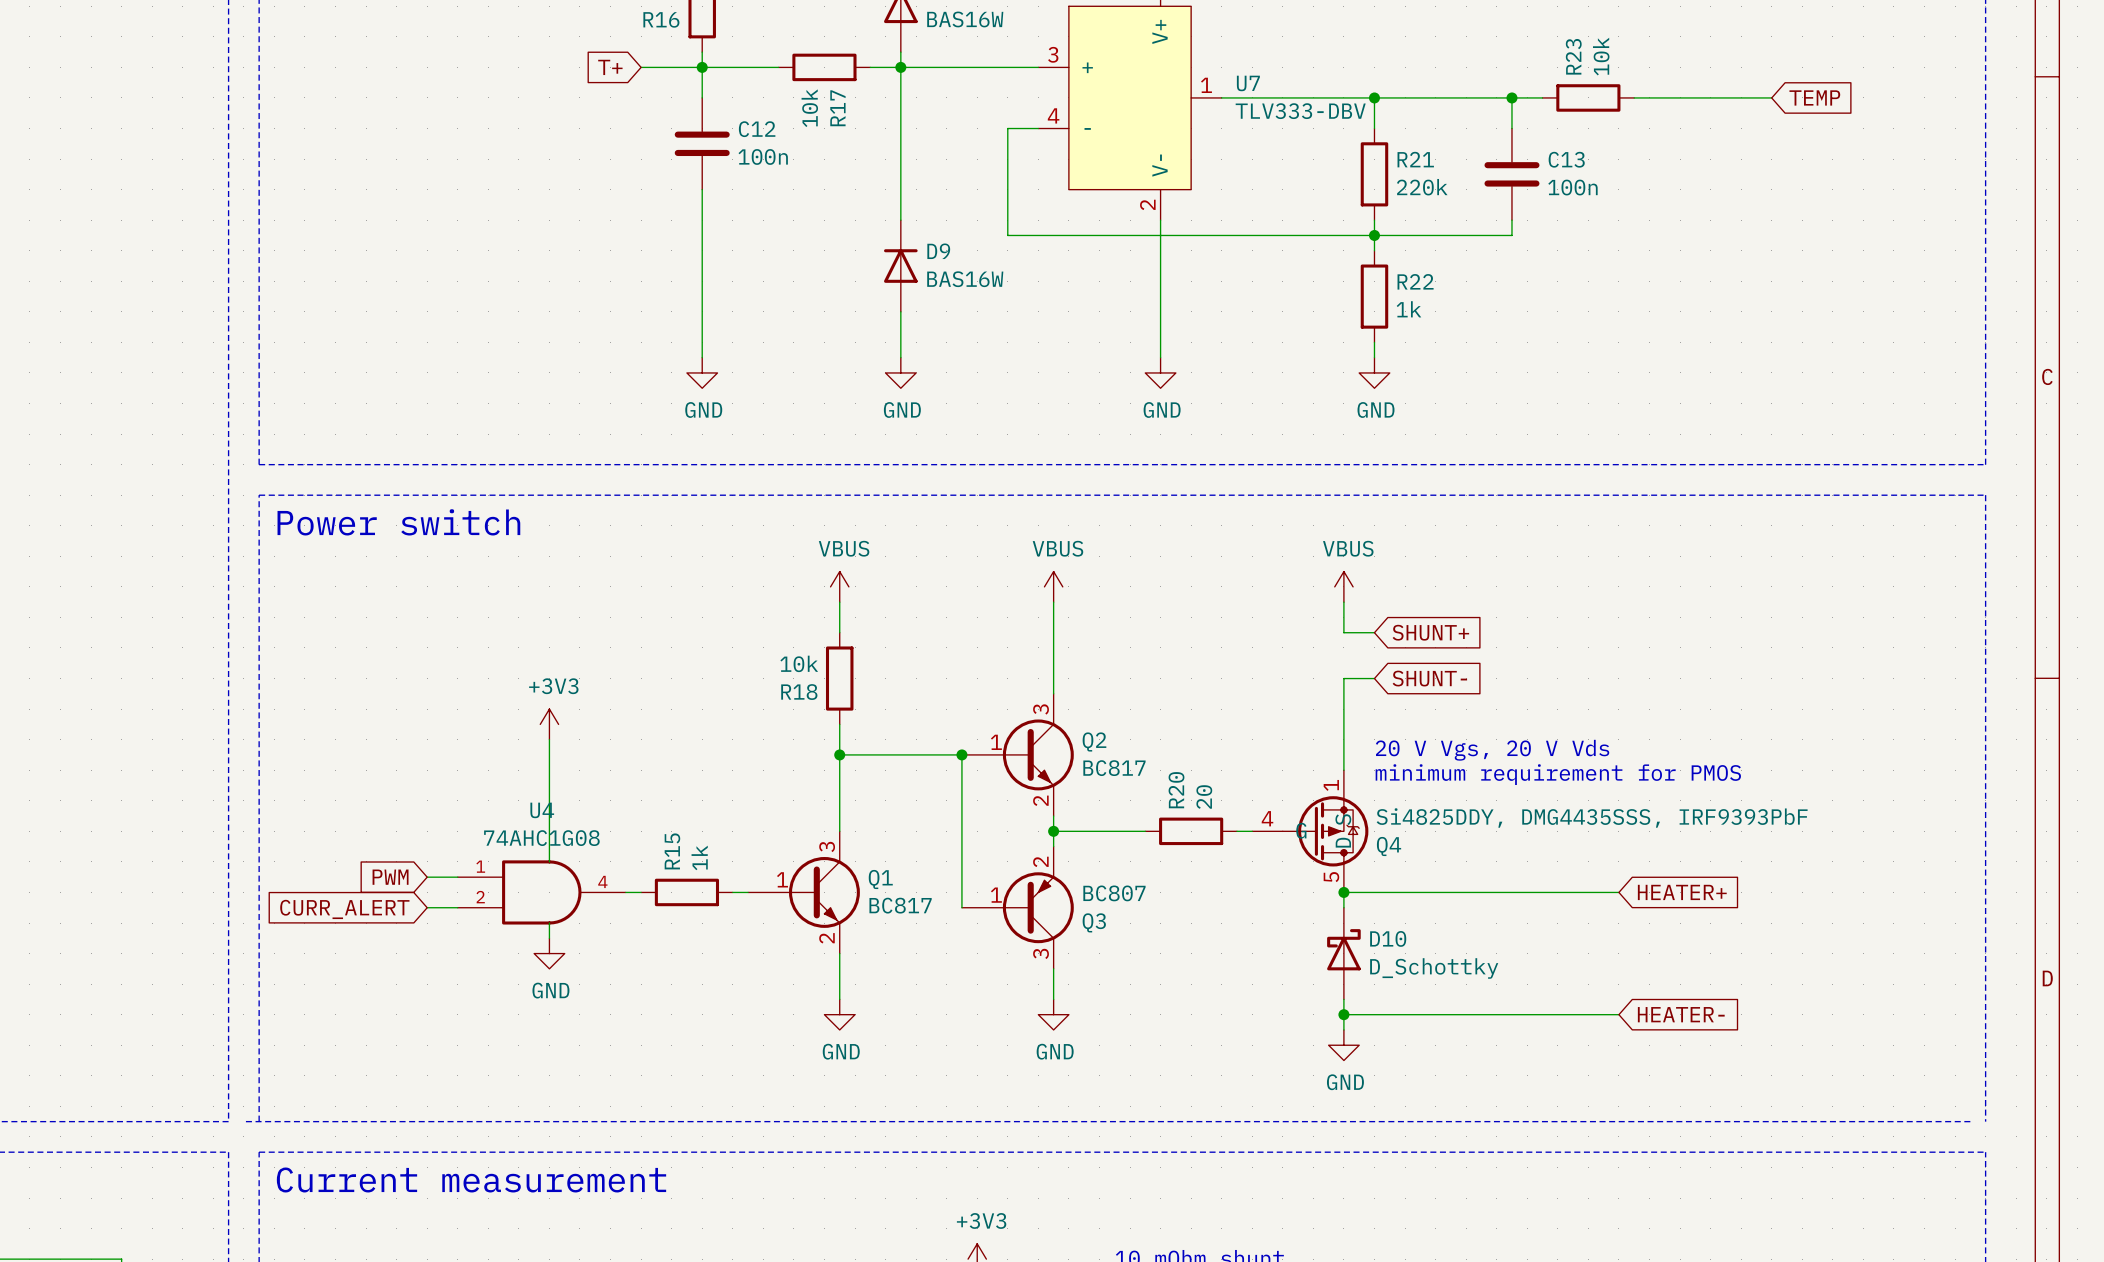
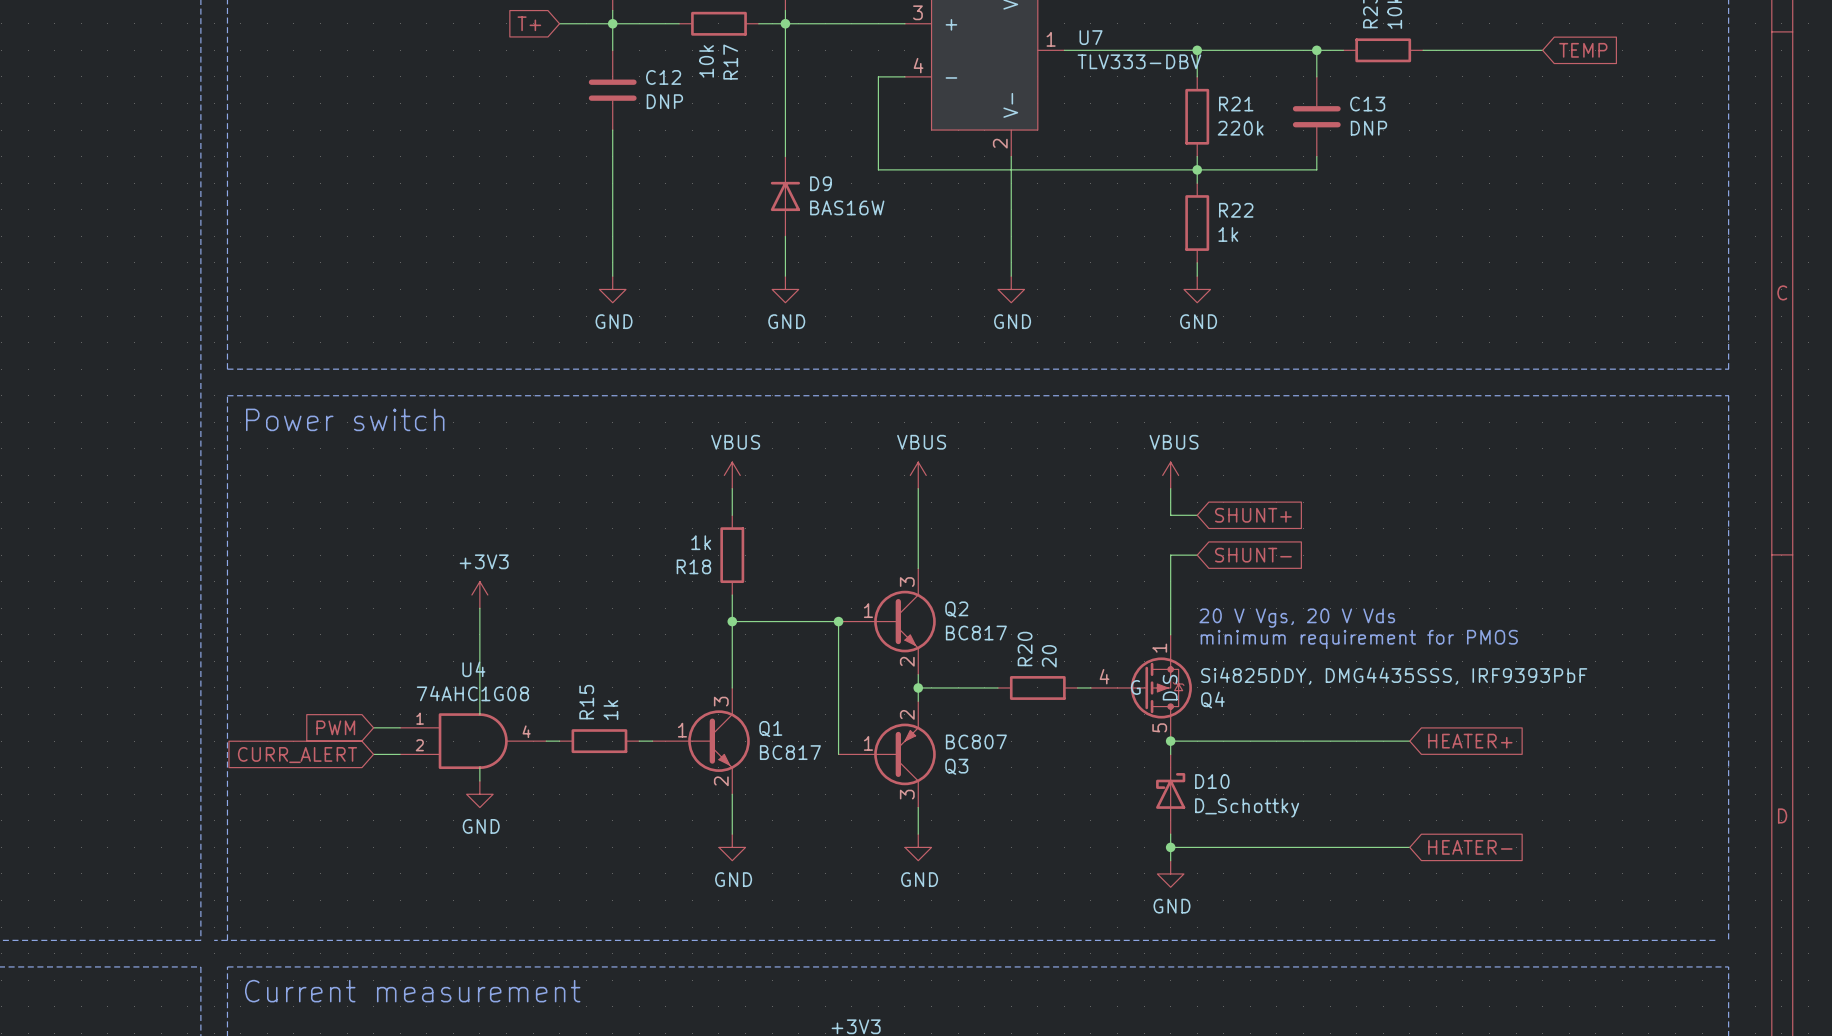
C12 value: 100n (763, 156) -> DNP (664, 101)
C13 value: 100n (1572, 187) -> DNP (1368, 128)
R18 value: 10k (799, 663) -> 1k (701, 542)

